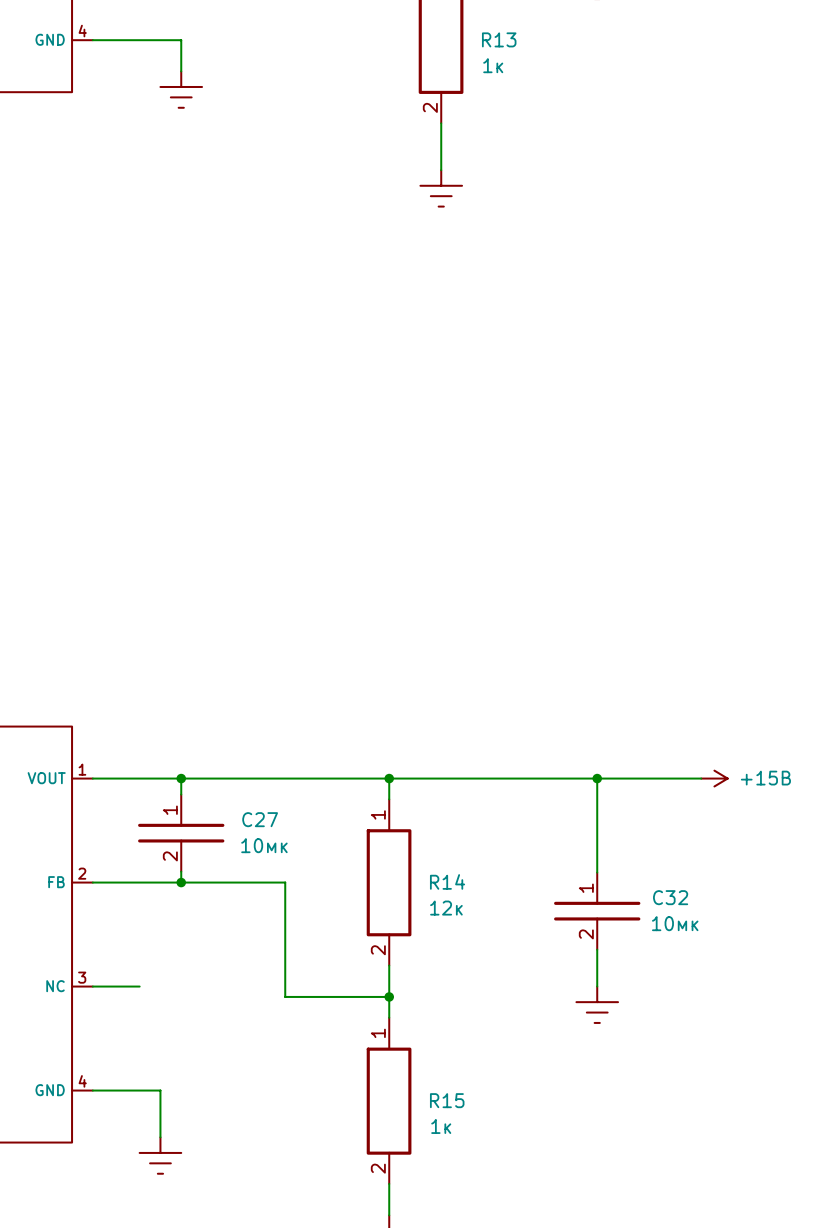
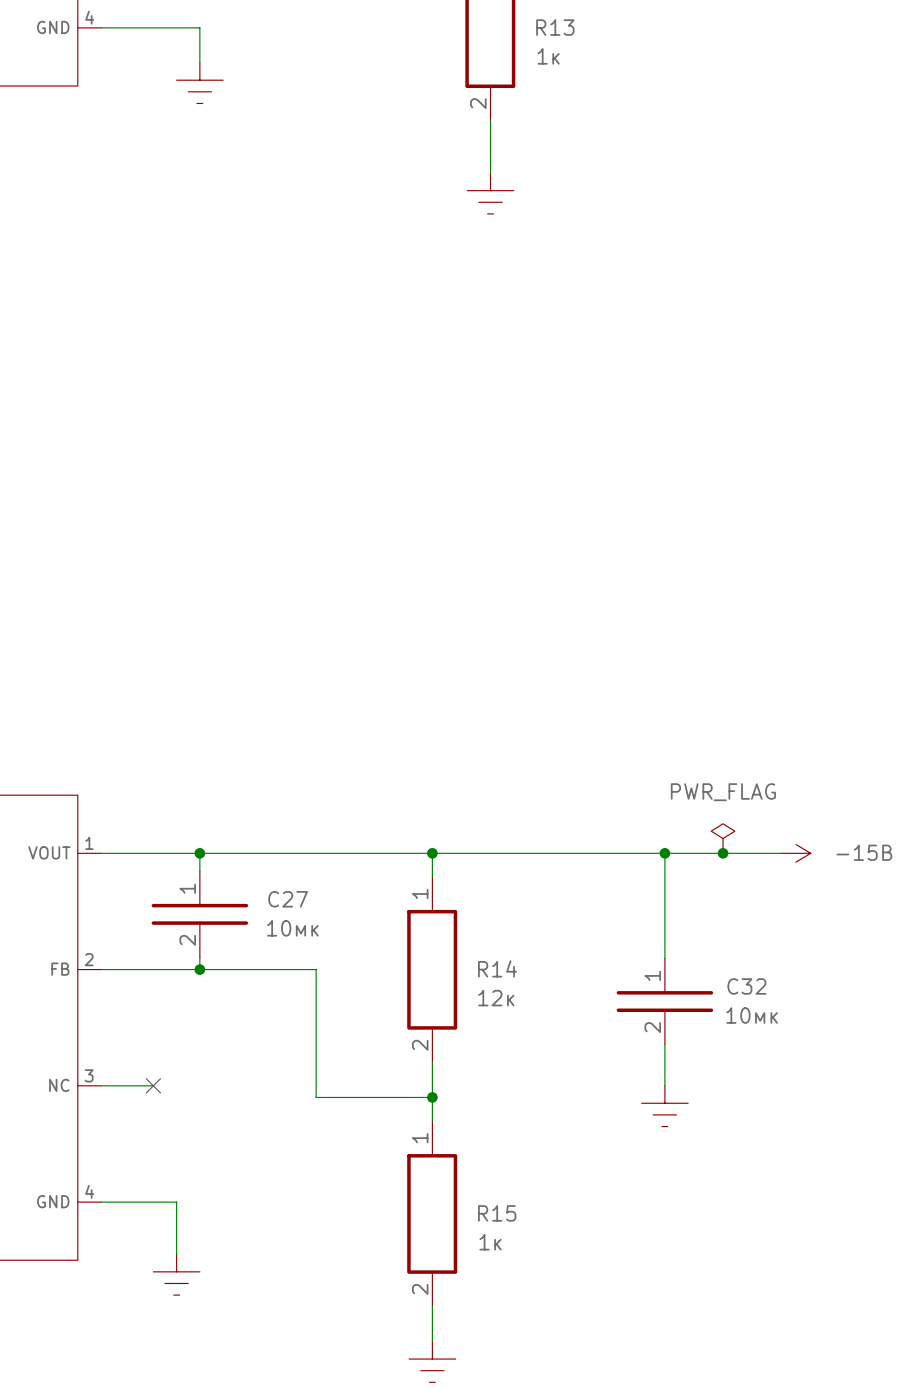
power symbol: none -> PWR_FLAG (723, 838)
junction: none -> (723, 853)
power symbol: +15B (714, 778) -> -15B (795, 853)
no-connect mark: none -> (153, 1085)

